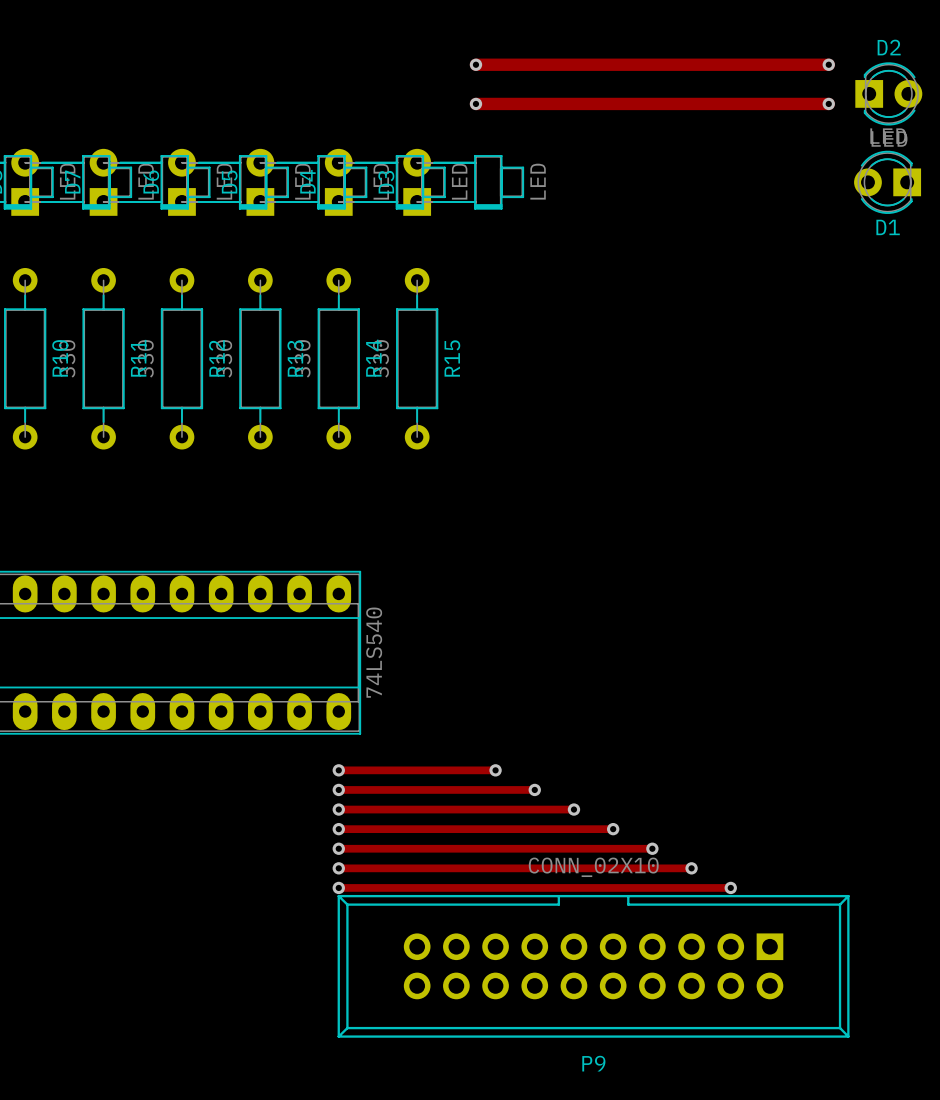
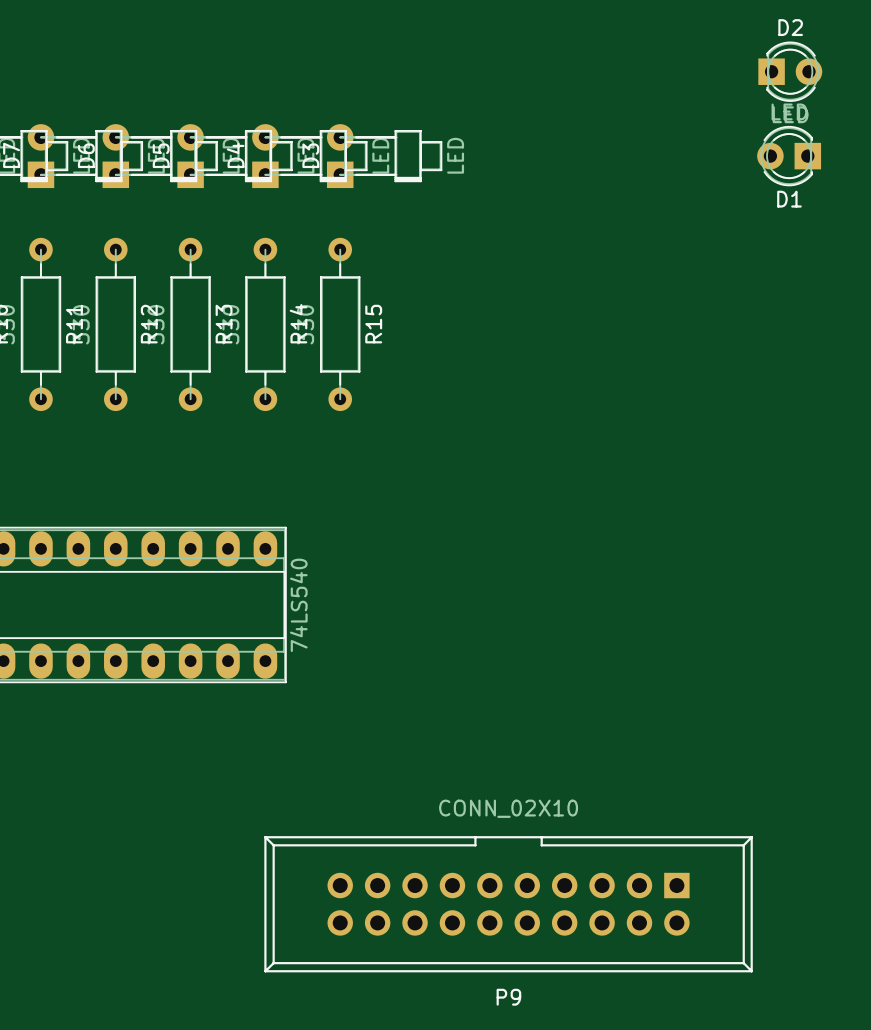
track: (475, 64) (828, 64) -> none
via: (475, 64) -> none
via: (828, 64) -> none
track: (475, 103) (828, 103) -> none
via: (475, 103) -> none
via: (828, 103) -> none
track: (338, 770) (495, 770) -> none
via: (338, 770) -> none
via: (495, 770) -> none
track: (338, 789) (534, 789) -> none
via: (338, 789) -> none
via: (534, 789) -> none
track: (338, 809) (573, 809) -> none
via: (338, 809) -> none
via: (573, 809) -> none
track: (338, 829) (613, 829) -> none
via: (338, 829) -> none
via: (613, 829) -> none
track: (338, 848) (652, 848) -> none
via: (338, 848) -> none
via: (652, 848) -> none
track: (338, 868) (691, 868) -> none
via: (338, 868) -> none
via: (691, 868) -> none
track: (338, 887) (730, 887) -> none
via: (338, 887) -> none
via: (730, 887) -> none

